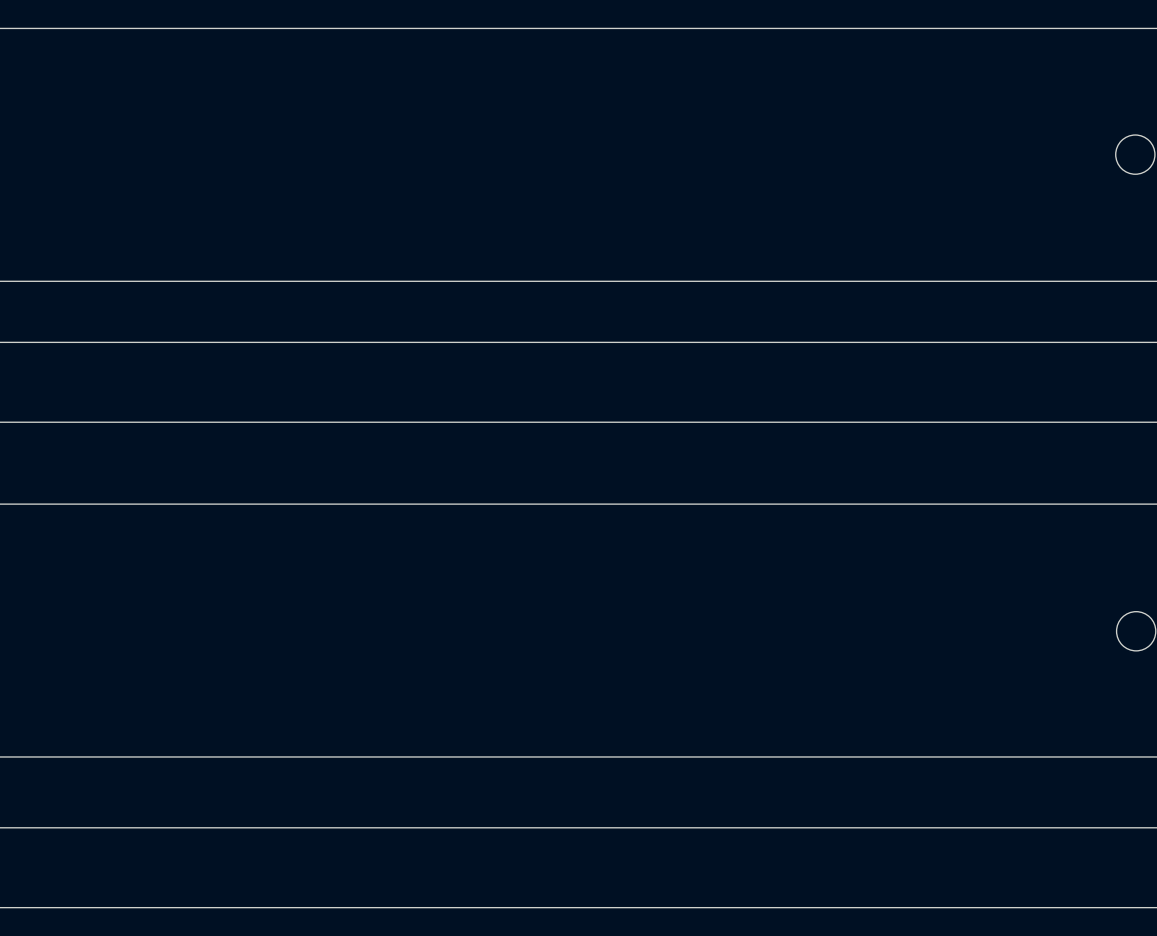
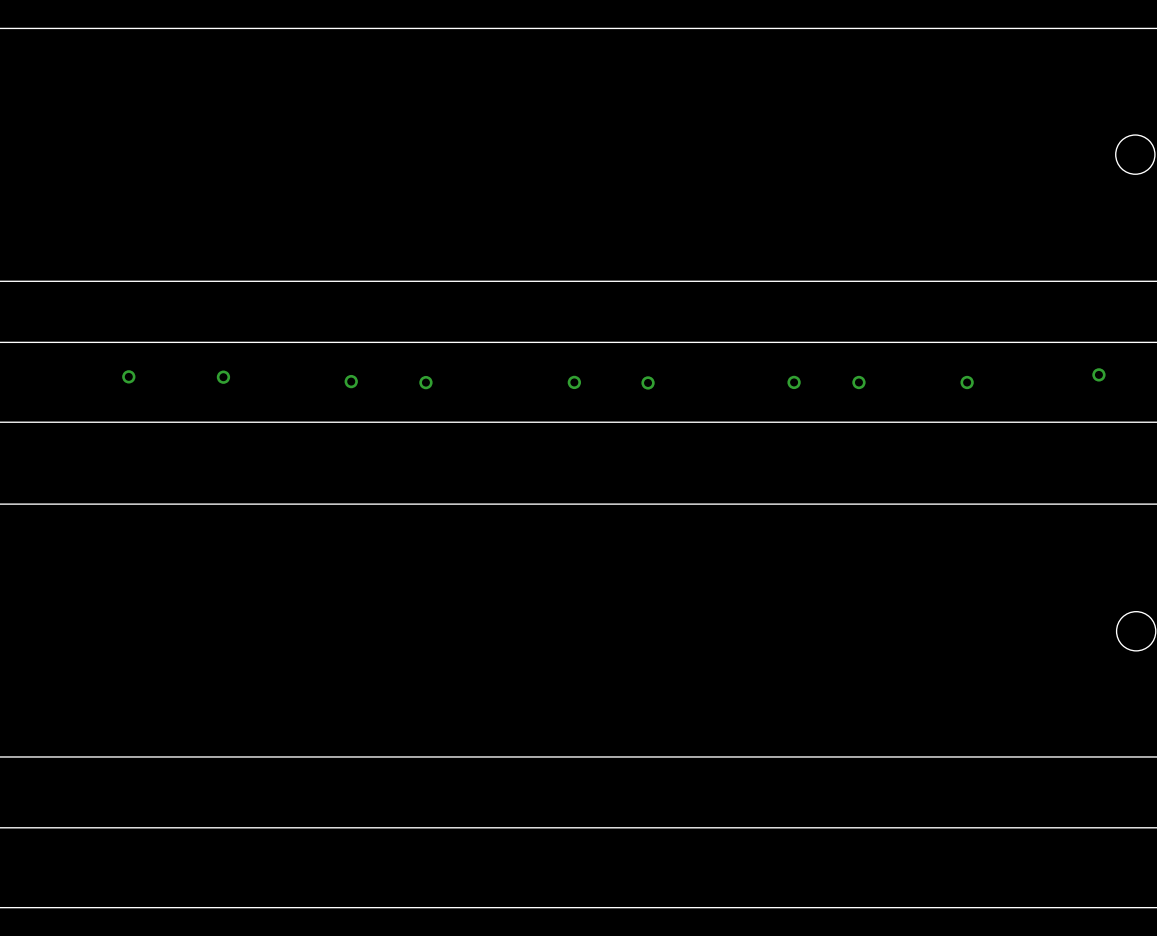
via: none -> (1098, 374)
via: none -> (128, 376)
via: none -> (223, 377)
via: none -> (351, 381)
via: none -> (425, 382)
via: none -> (574, 382)
via: none -> (648, 382)
via: none -> (794, 382)
via: none -> (858, 382)
via: none -> (967, 382)

